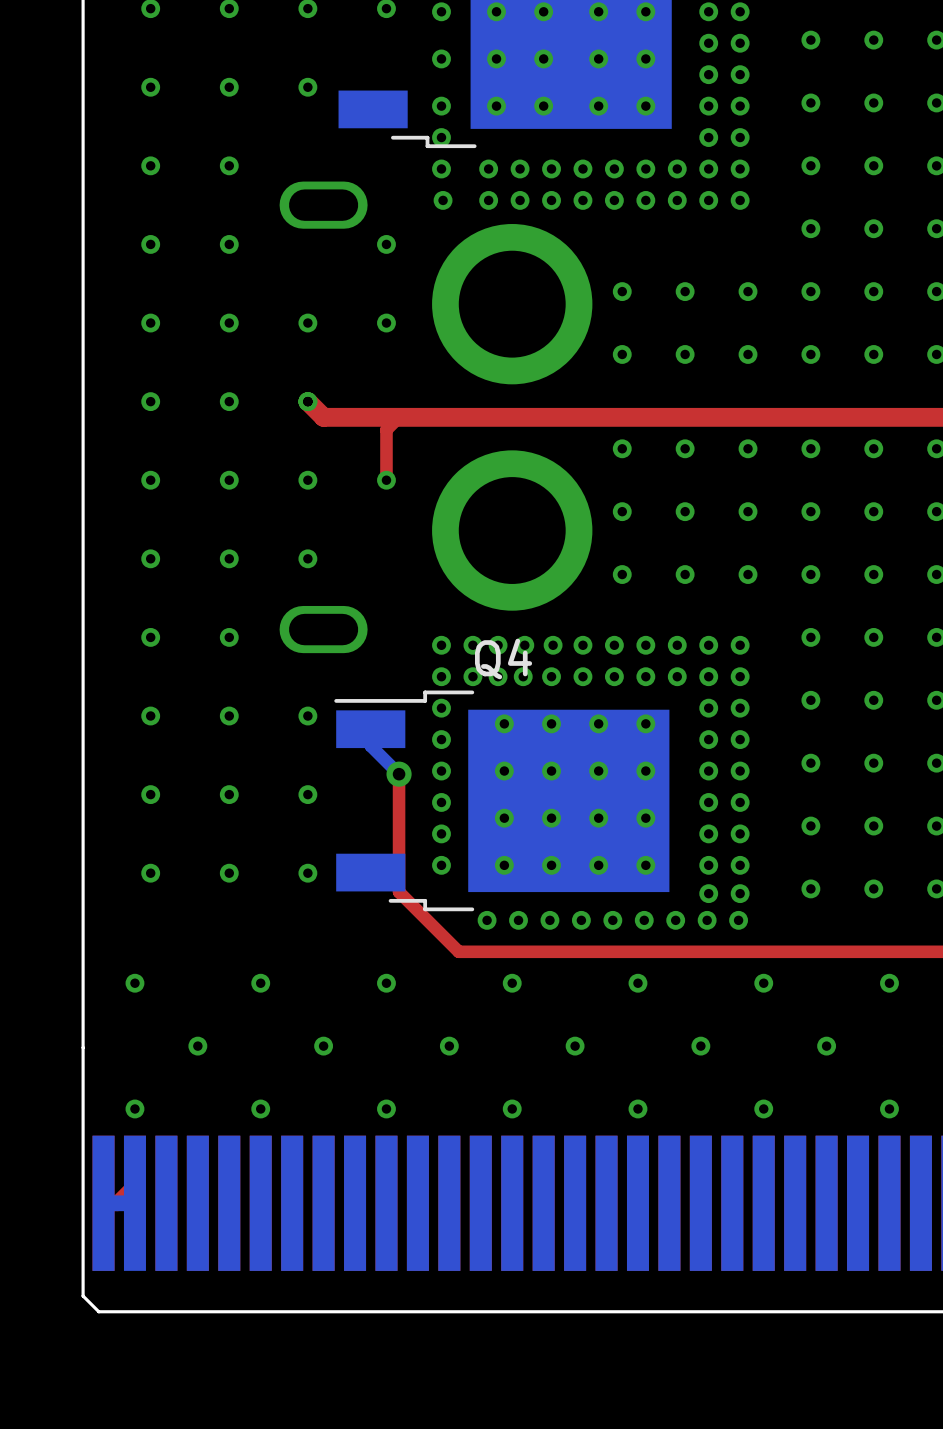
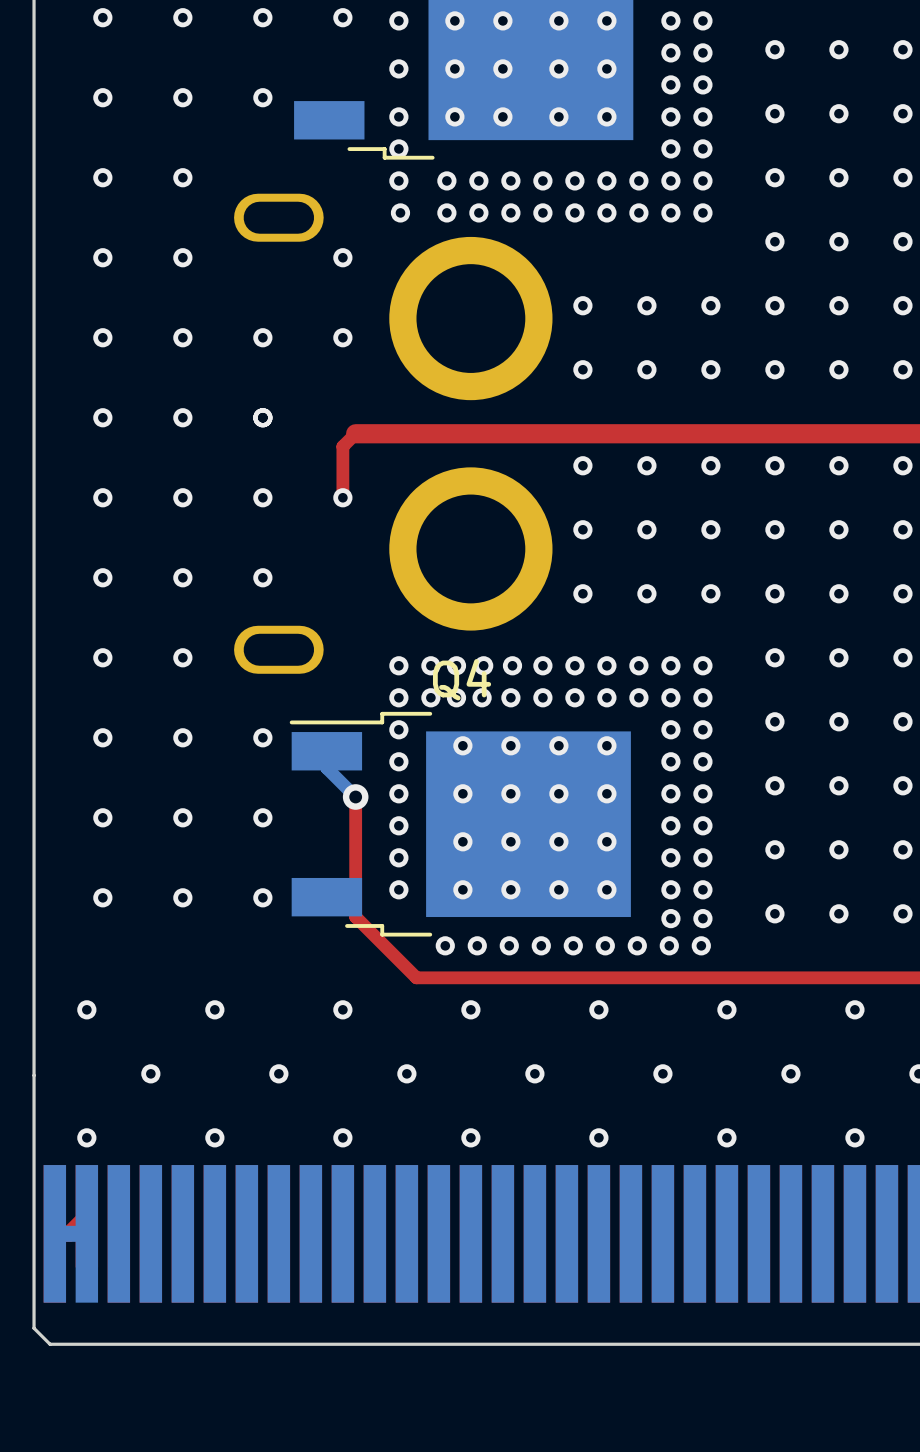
top track: (307, 401) (323, 417) (399, 417) -> none

